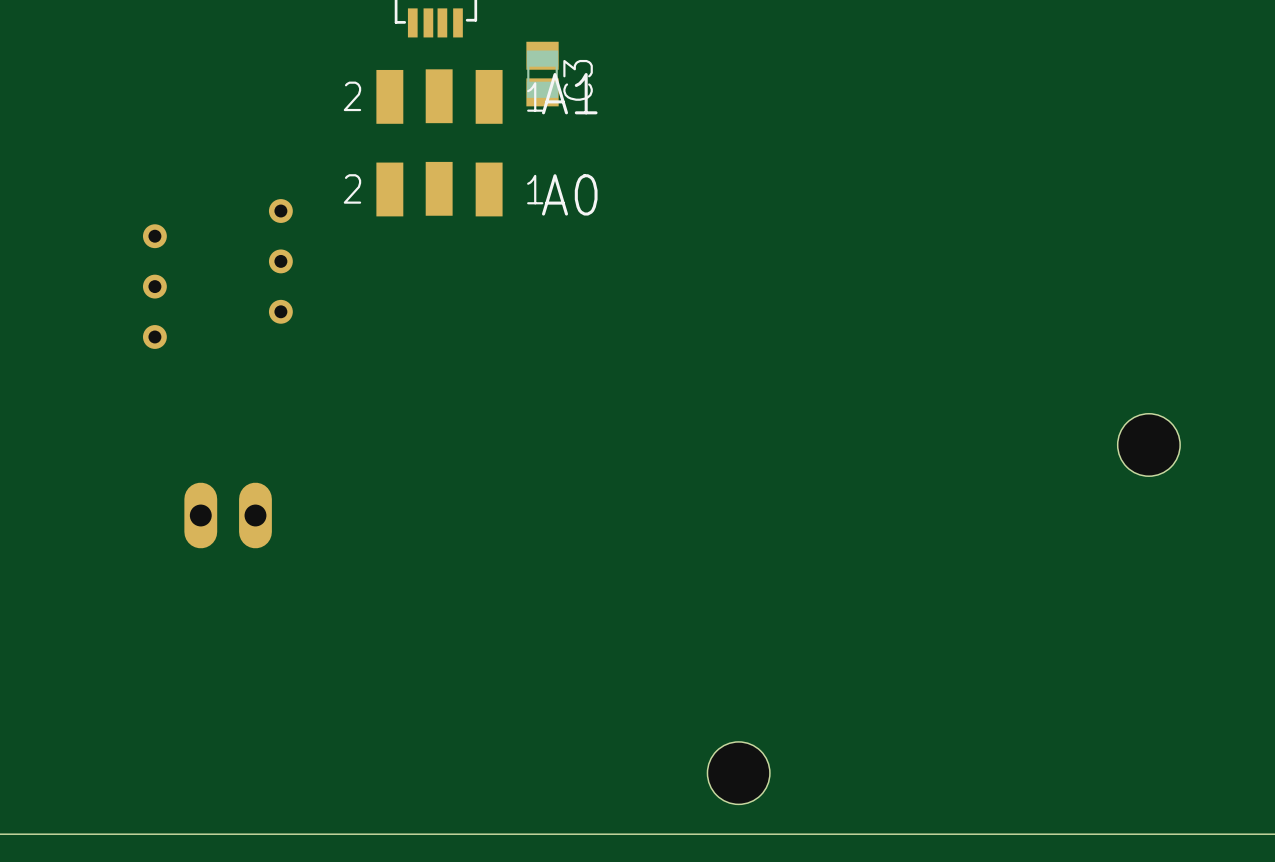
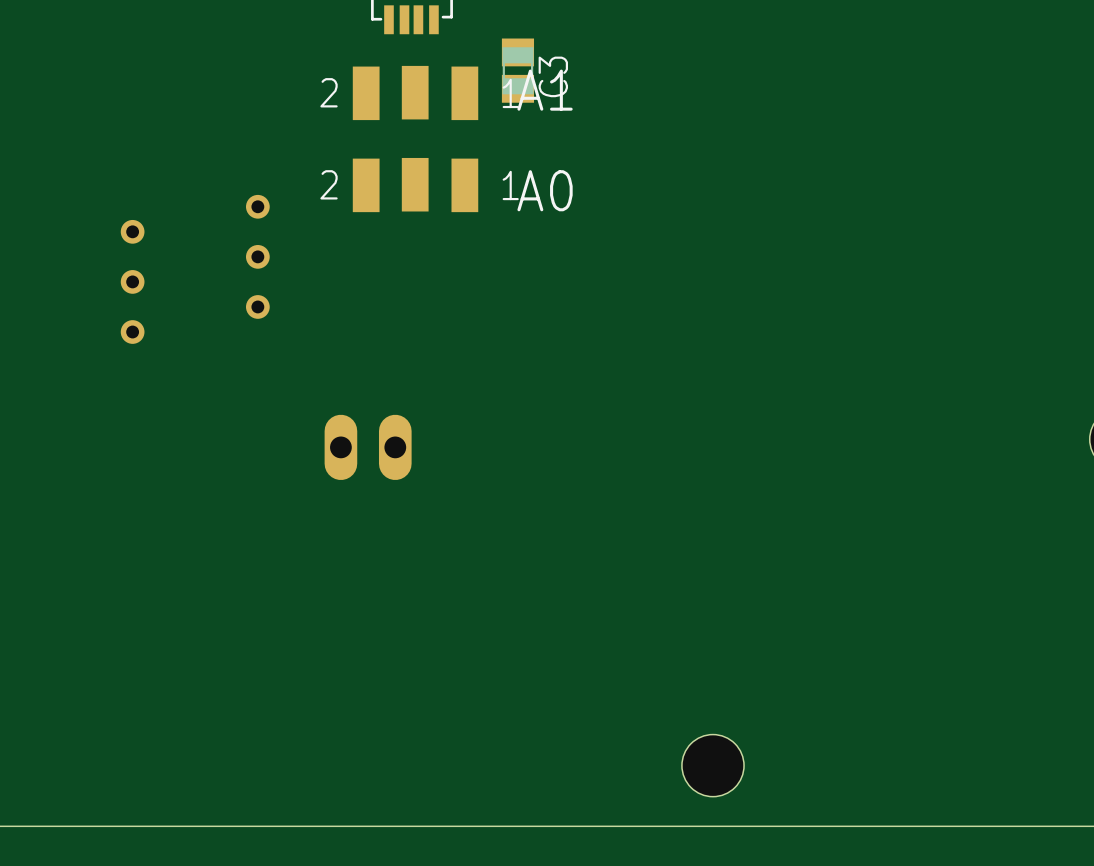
part position: (228, 515) -> (368, 447)

